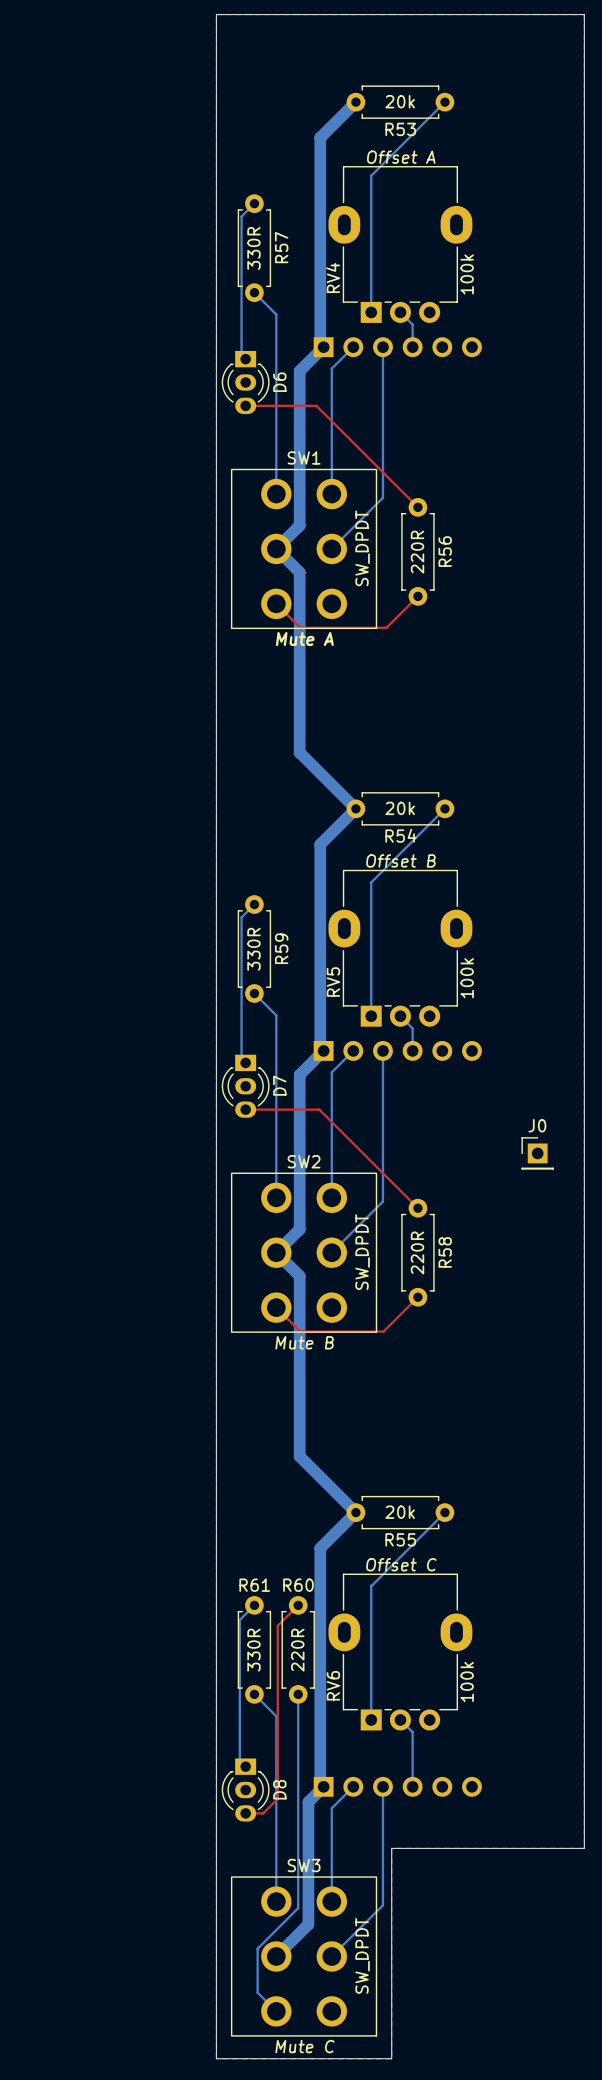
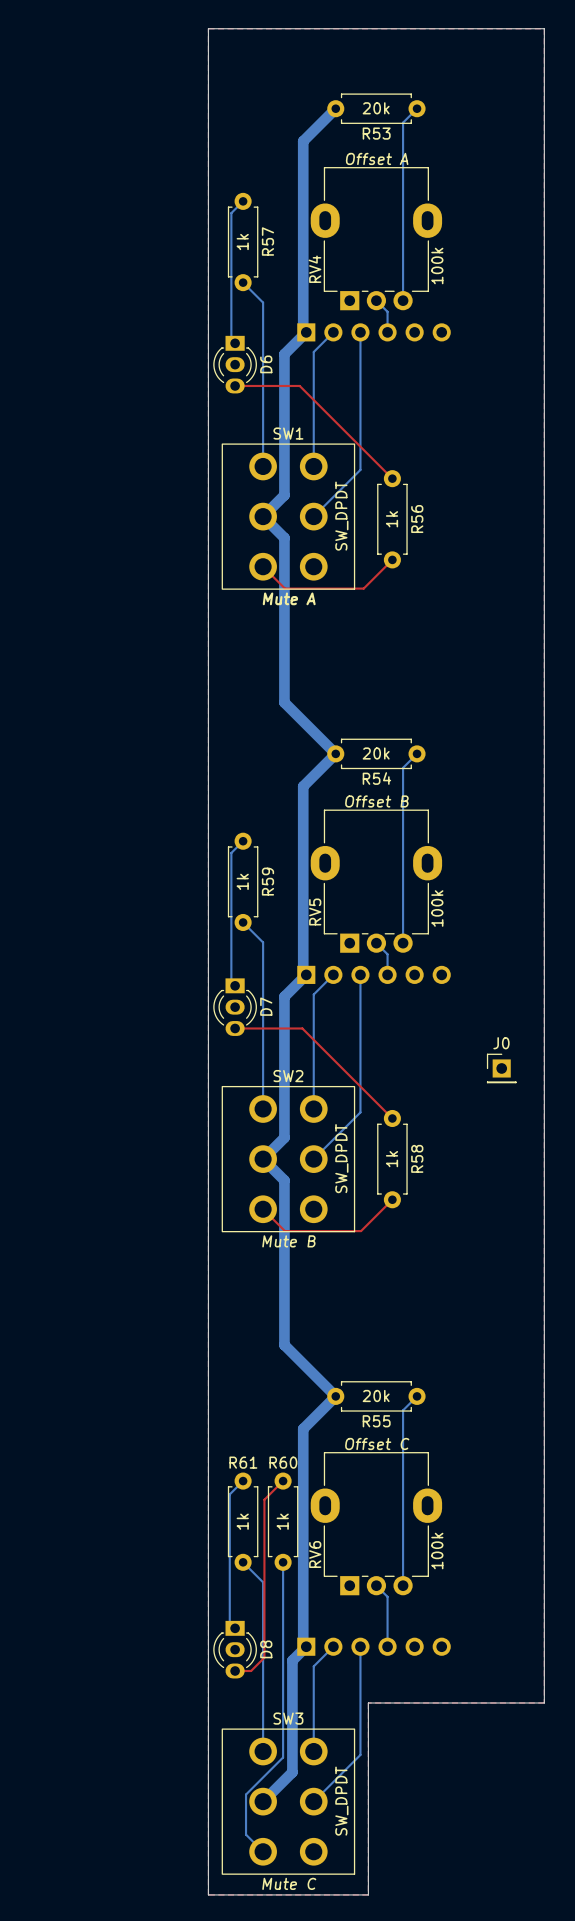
bottom track: (429, 117) (371, 175) (371, 312) -> (403, 122) (403, 300)
R57 value: 330R (253, 248) -> 1k (242, 242)
R56 value: 220R (417, 552) -> 1k (392, 519)
bottom track: (429, 824) (371, 882) (371, 1016) -> (403, 767) (403, 943)
R59 value: 330R (253, 949) -> 1k (242, 881)
R58 value: 220R (417, 1252) -> 1k (392, 1159)
bottom track: (429, 1527) (371, 1586) (371, 1719) -> (403, 1410) (403, 1585)
R61 value: 330R (253, 1650) -> 1k (242, 1521)
R60 value: 220R (297, 1650) -> 1k (282, 1521)

